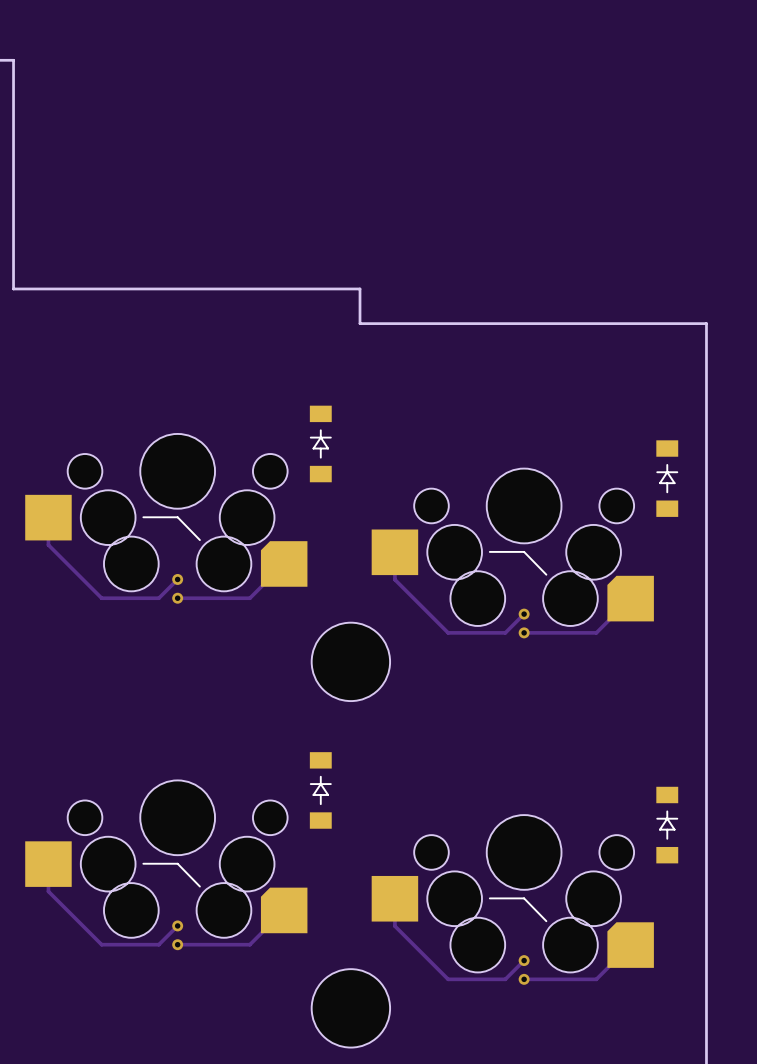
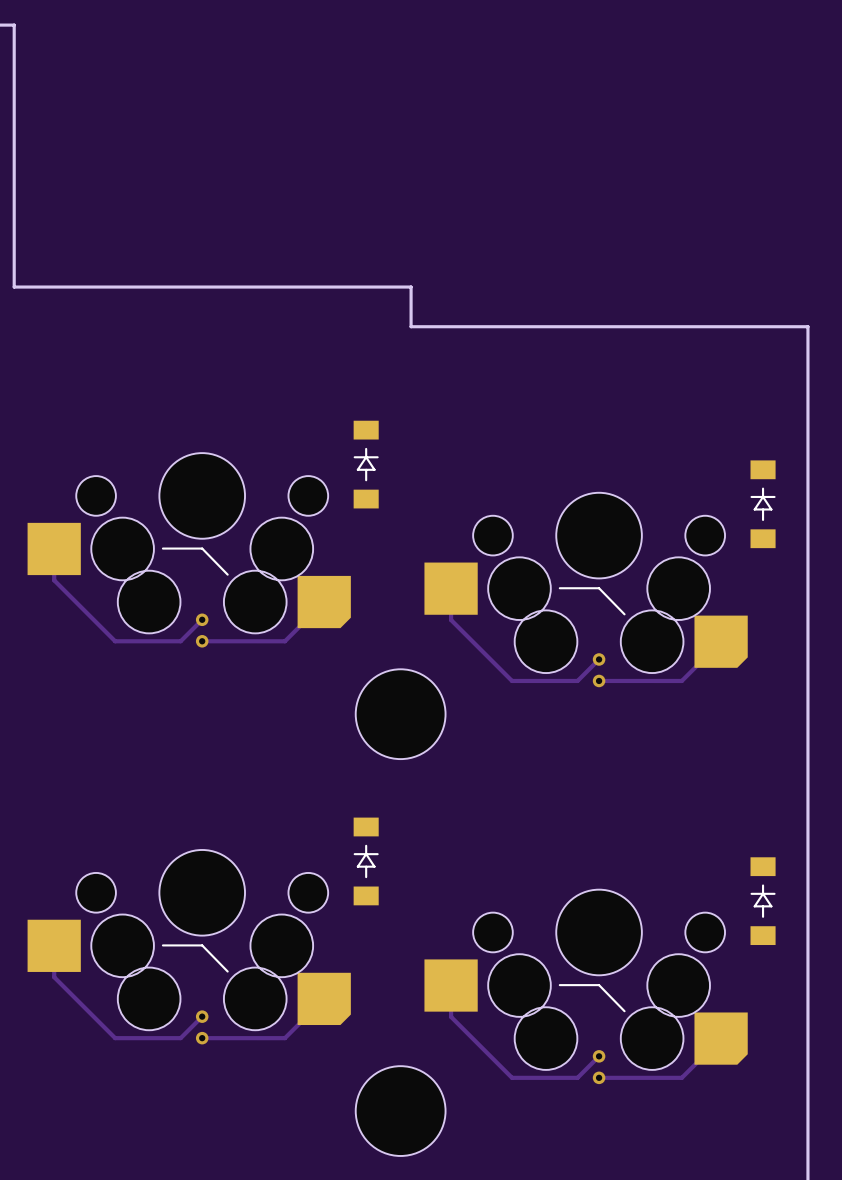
part footprint: [25, 433, 308, 592] -> [27, 453, 351, 634]
part footprint: [371, 468, 654, 626] -> [424, 492, 748, 674]
part footprint: [25, 780, 308, 938] -> [27, 849, 351, 1031]
part footprint: [371, 815, 654, 973] -> [424, 889, 748, 1070]

